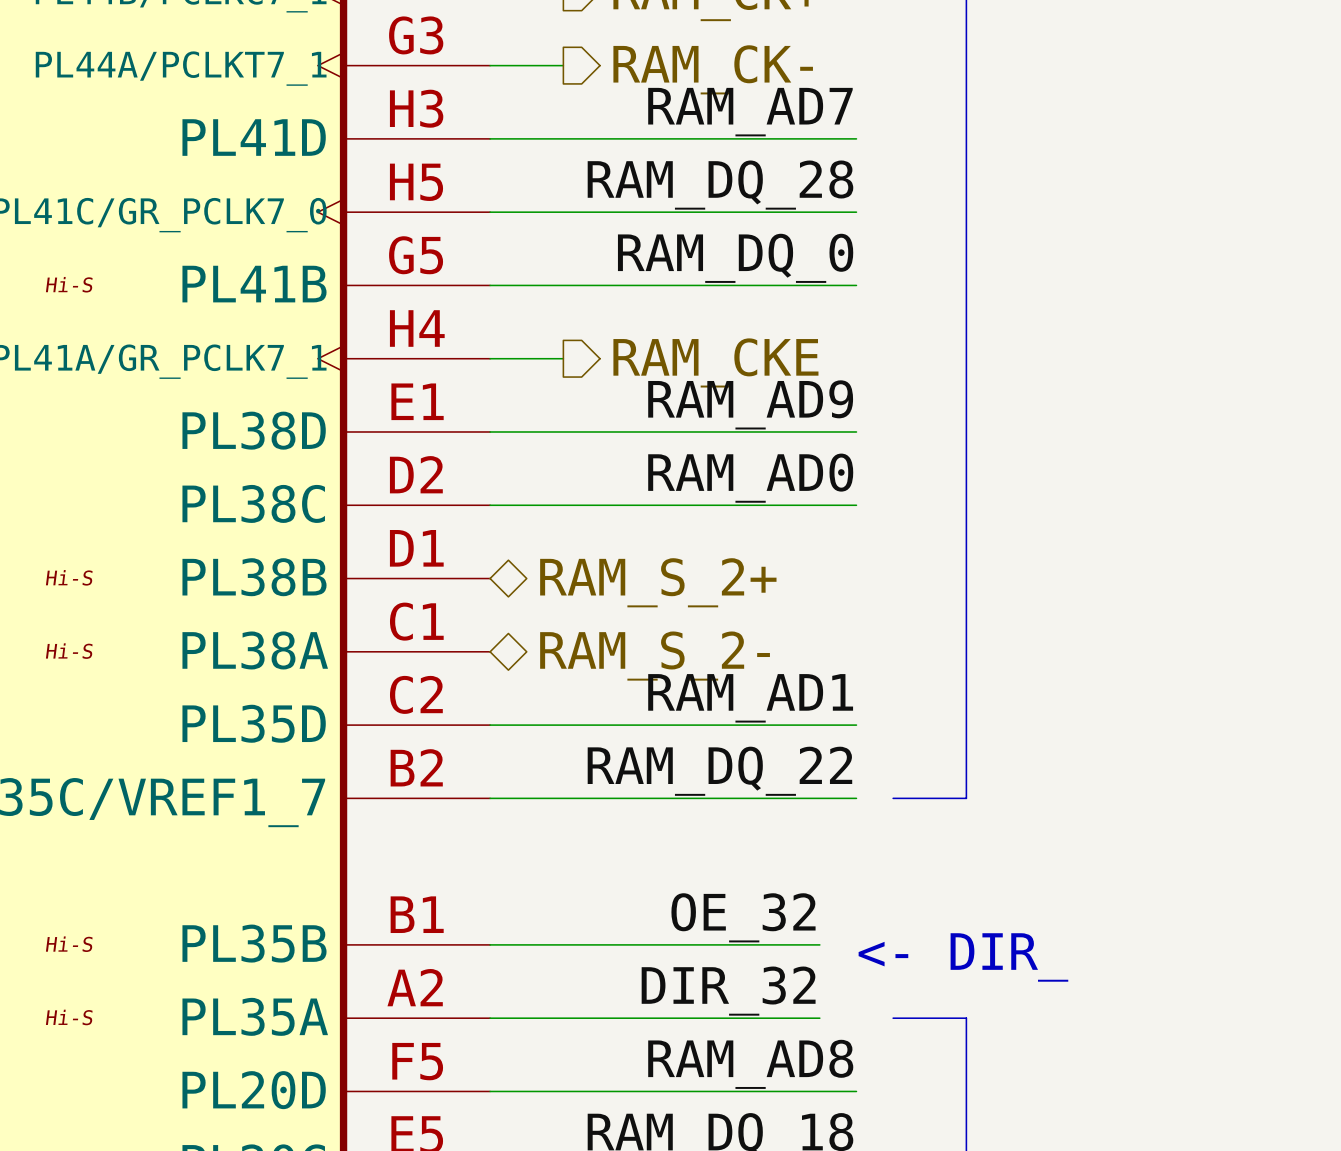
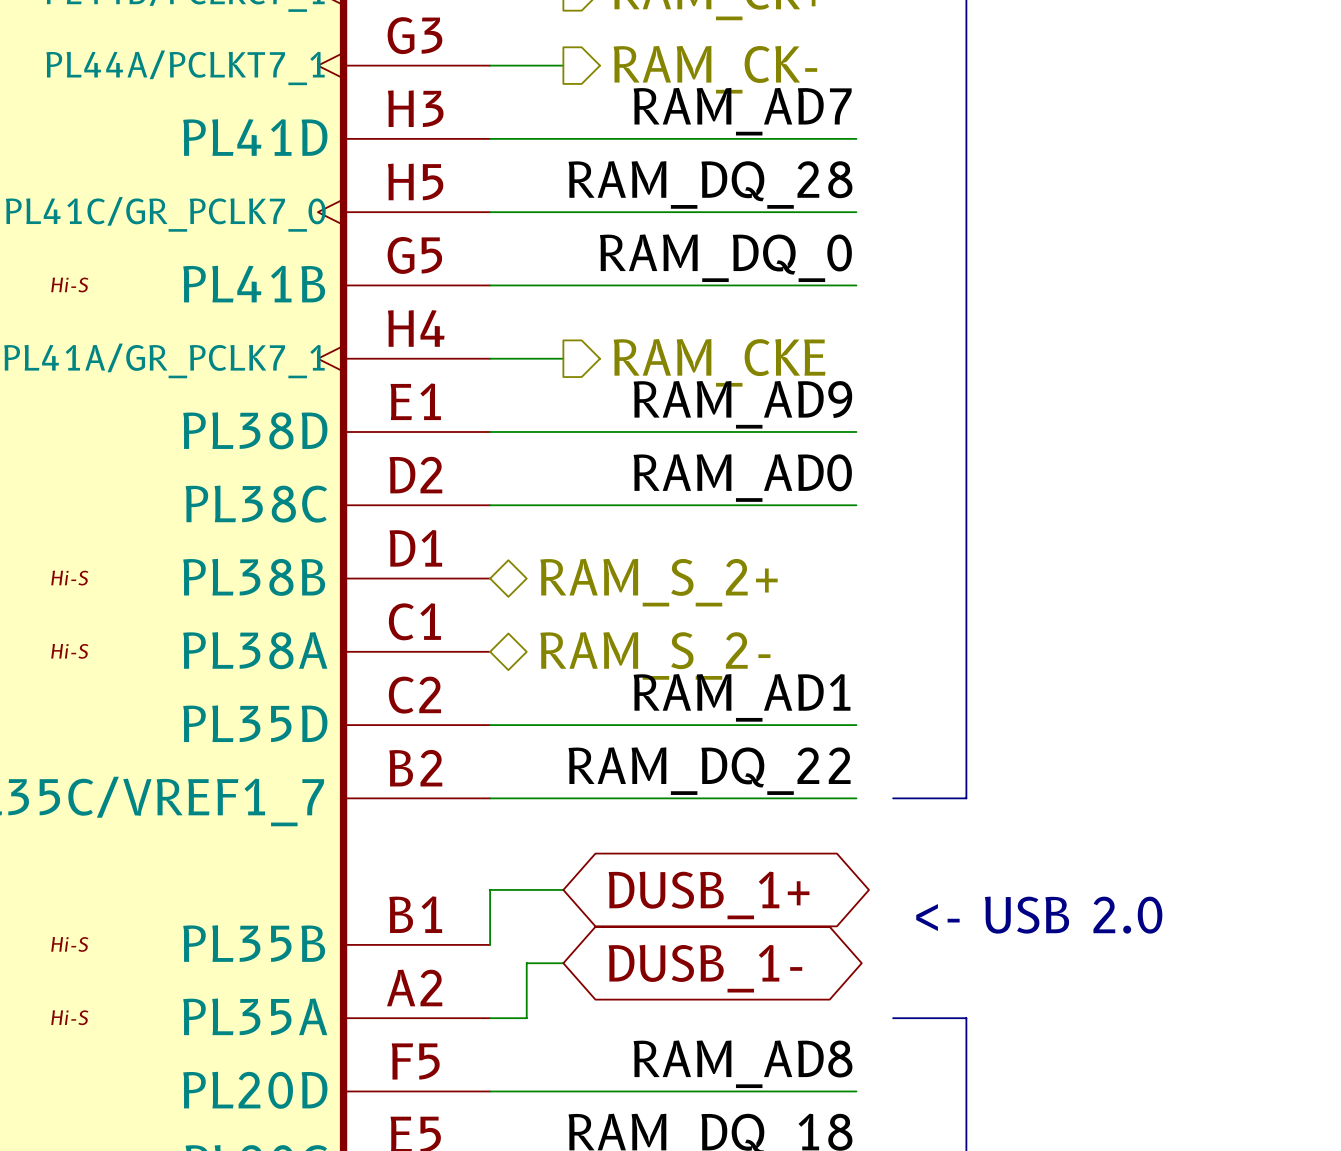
global label: none -> DUSB_1+ (709, 895)
text: none -> <- USB 2.0 (1039, 915)
label: OE_32 (743, 917) -> none
wire: (490, 944) (819, 944) -> (490, 944) (490, 889) (563, 889)
text: <- DIR_ (963, 957) -> none
global label: none -> DUSB_1- (705, 968)
label: DIR_32 (728, 991) -> none
wire: (526, 1018) (819, 1018) -> (526, 1018) (526, 963) (563, 963)

